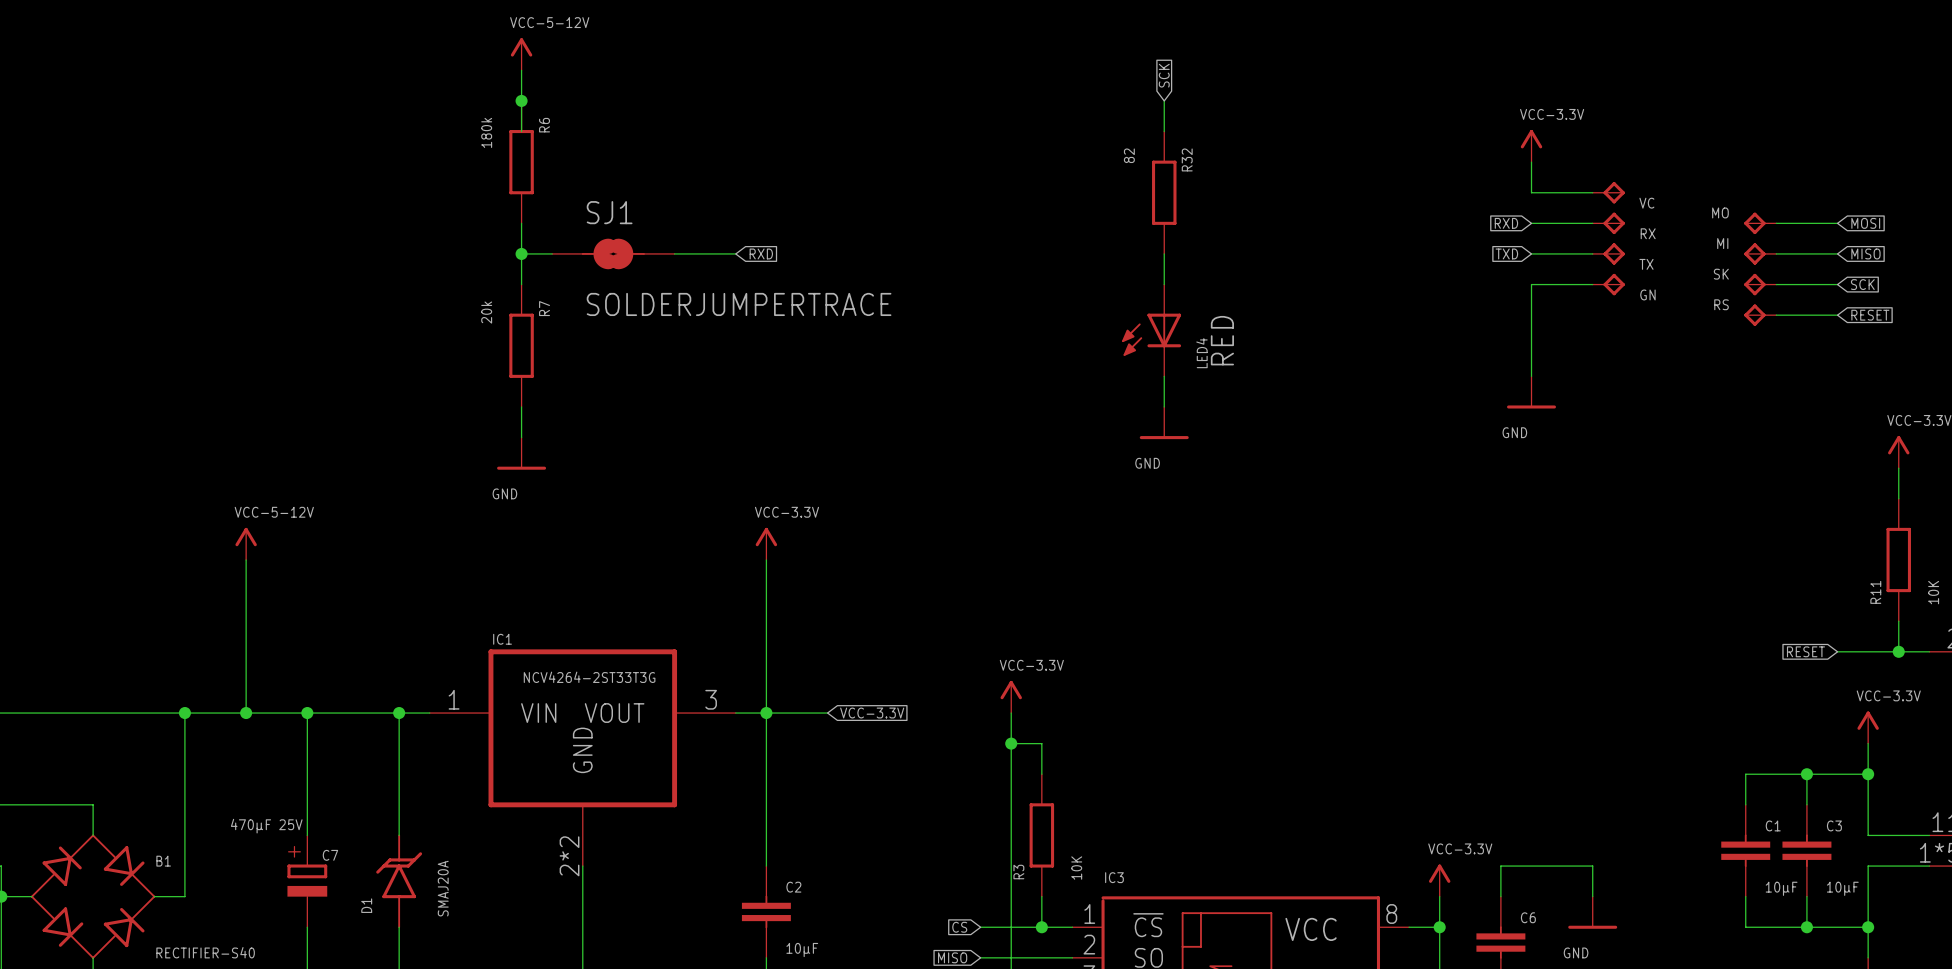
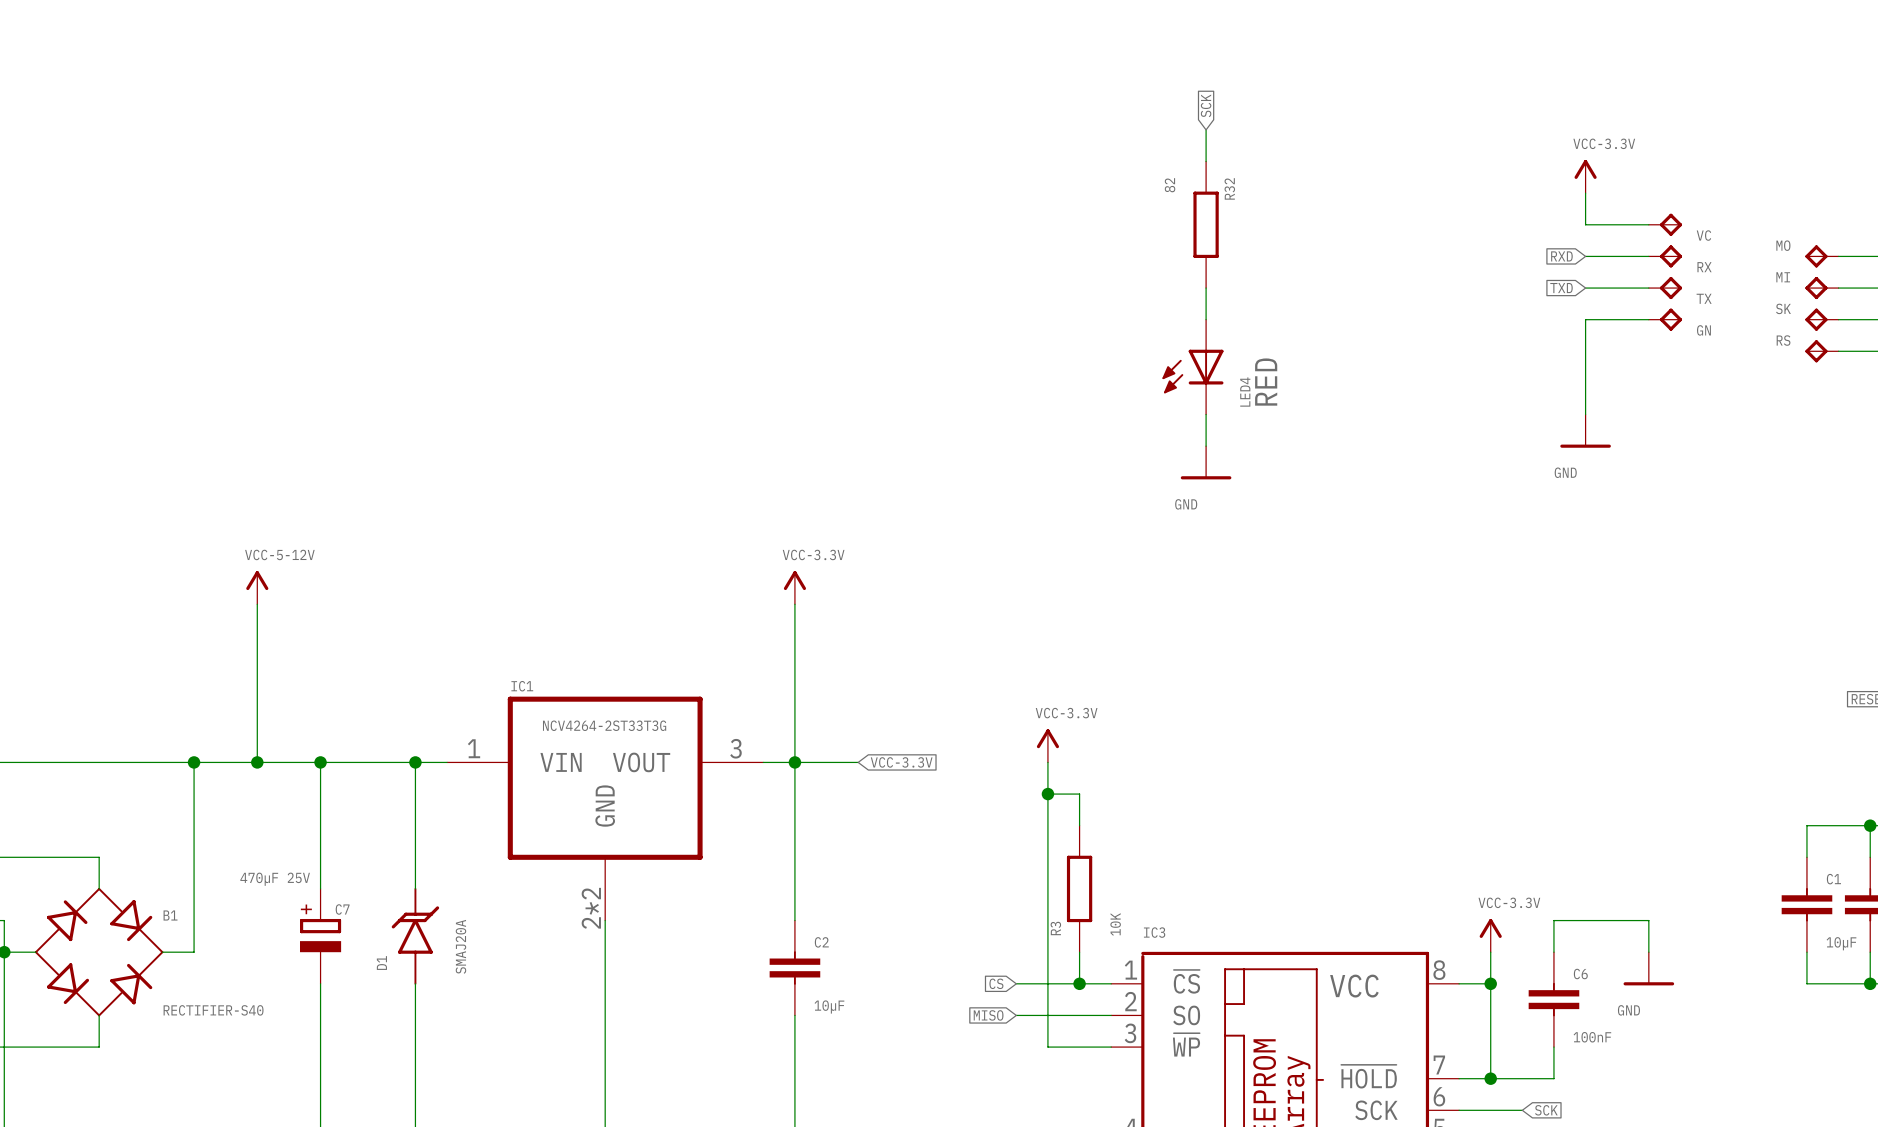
power symbol: VCC-5-12V (521, 54) -> none
wire: (521, 70) (521, 131) -> none
junction: (521, 100) -> none
R6: 180k (521, 162) -> none
wire: (521, 223) (521, 284) -> none
wire: (521, 253) (552, 253) -> none
junction: (521, 253) -> none
SJ1: SOLDERJUMPERTRACE (613, 253) -> none
wire: (674, 253) (735, 253) -> none
global label: RXD (761, 253) -> none
R7: 20k (521, 345) -> none
wire: (521, 406) (521, 437) -> none
power symbol: GND (521, 453) -> none

